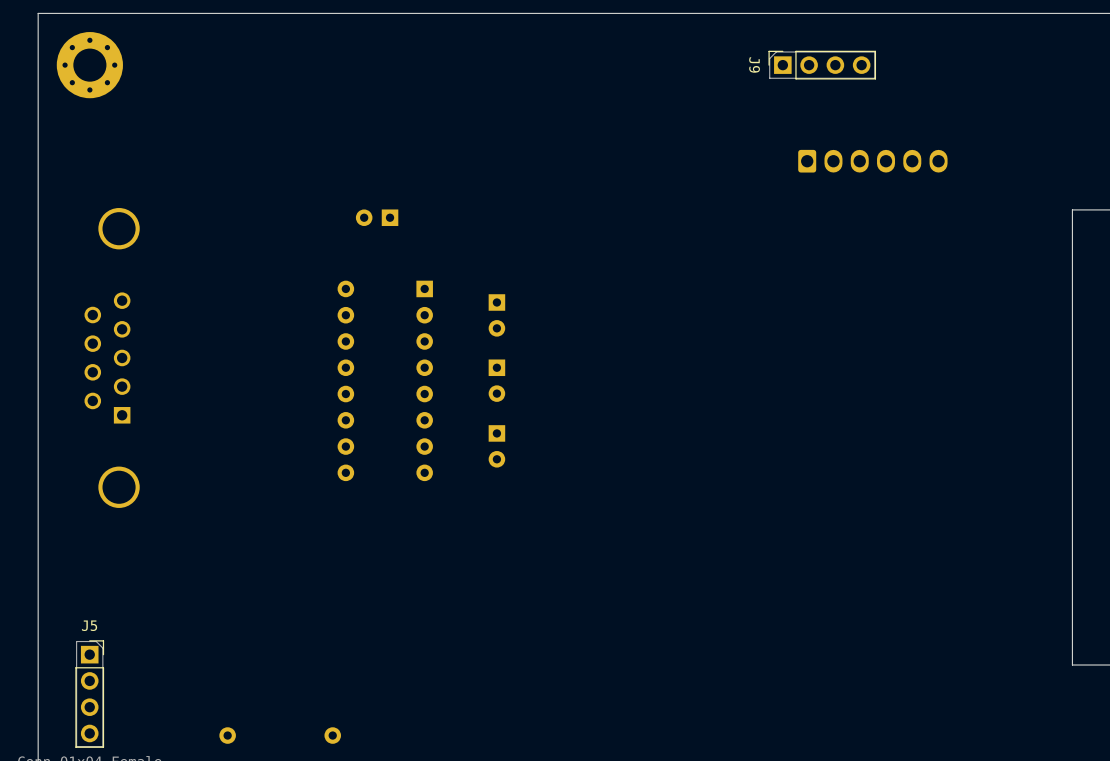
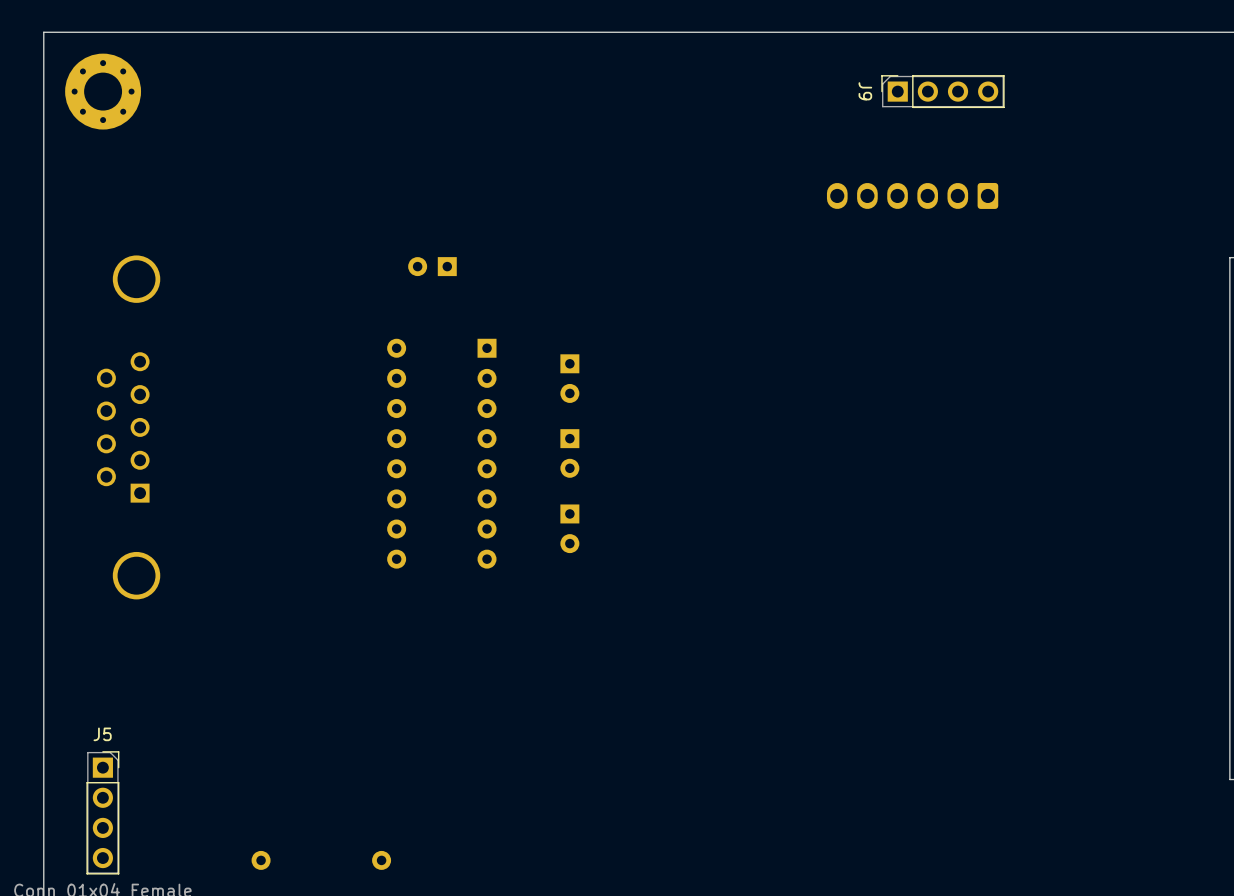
part rotation: 0° (872, 161) -> 180° (912, 195)

